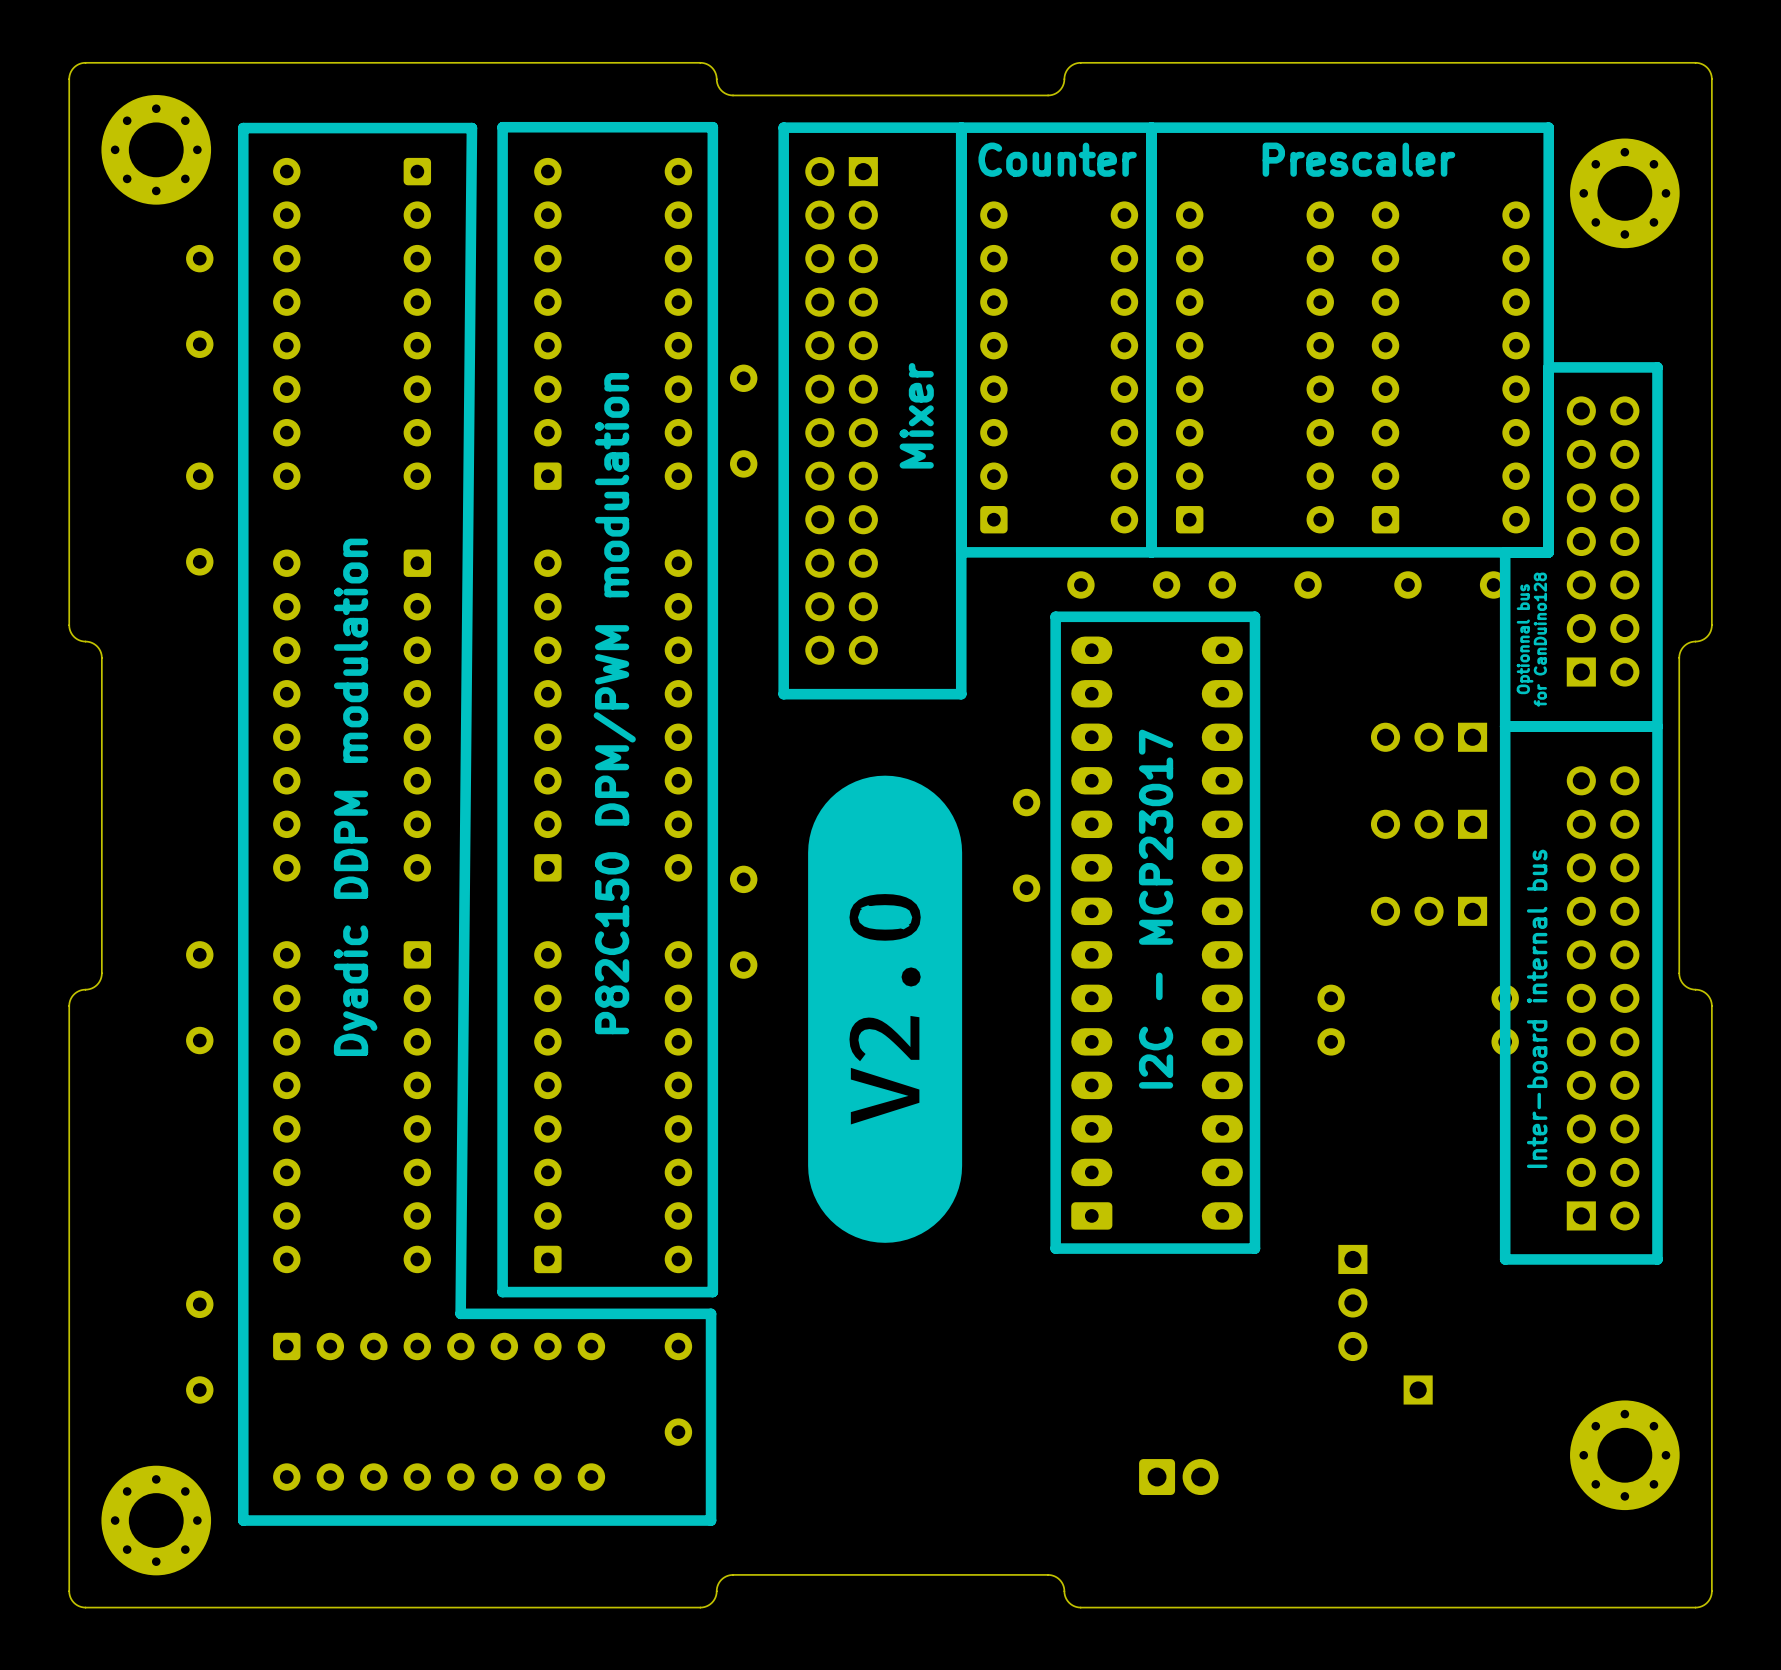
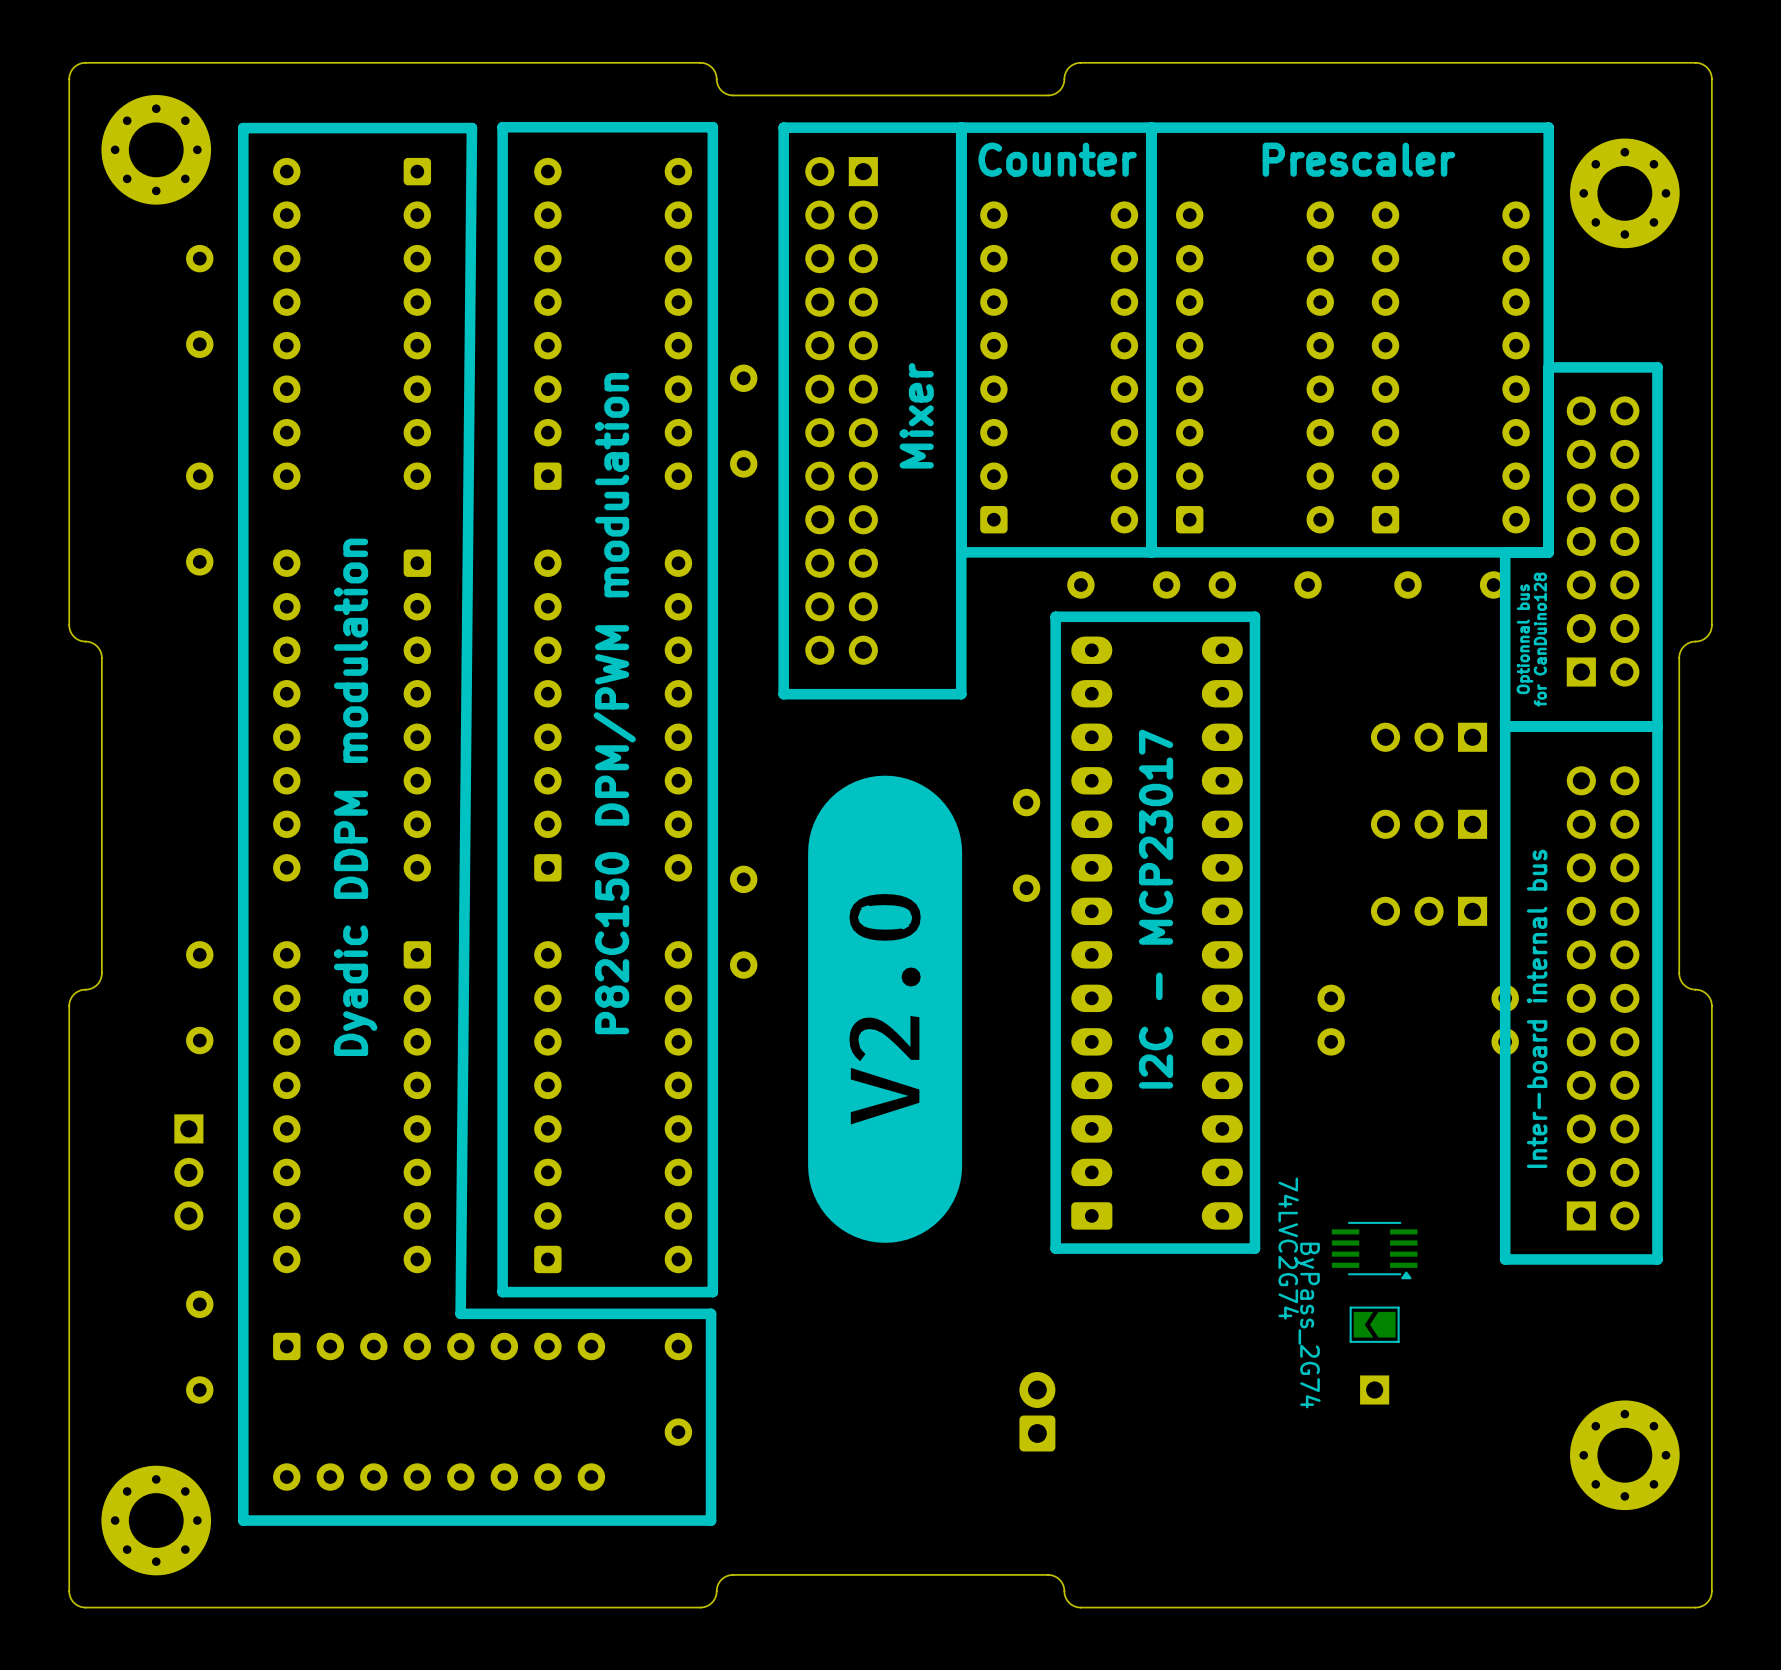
part: none -> (188, 1172)
part: none -> 74LVC2G74 (1374, 1250)
part: (1352, 1302) -> none
ByPass_2G74: none -> (1374, 1324)
part position: (1418, 1389) -> (1374, 1389)
part rotation: 0° (1178, 1477) -> 90° counterclockwise (1037, 1411)
part position: (1178, 1477) -> (1037, 1411)

